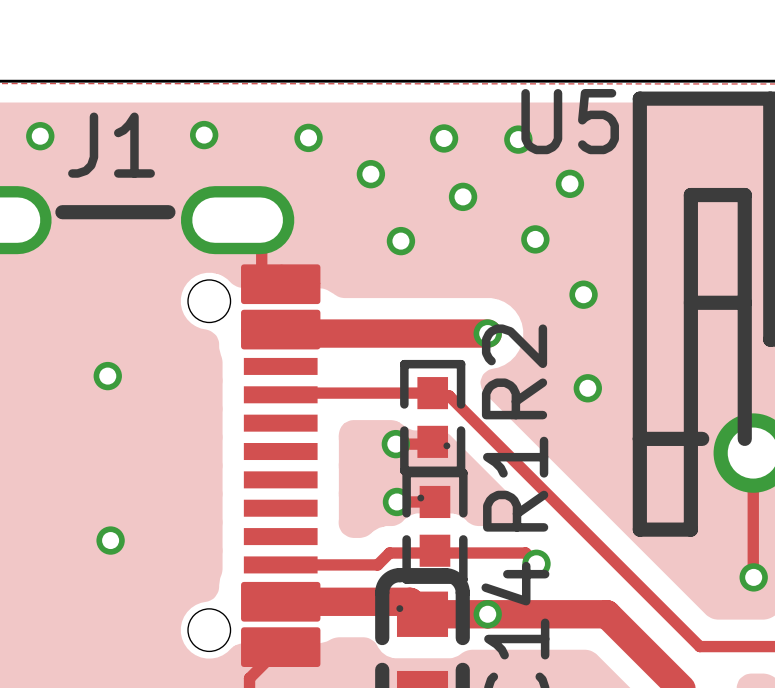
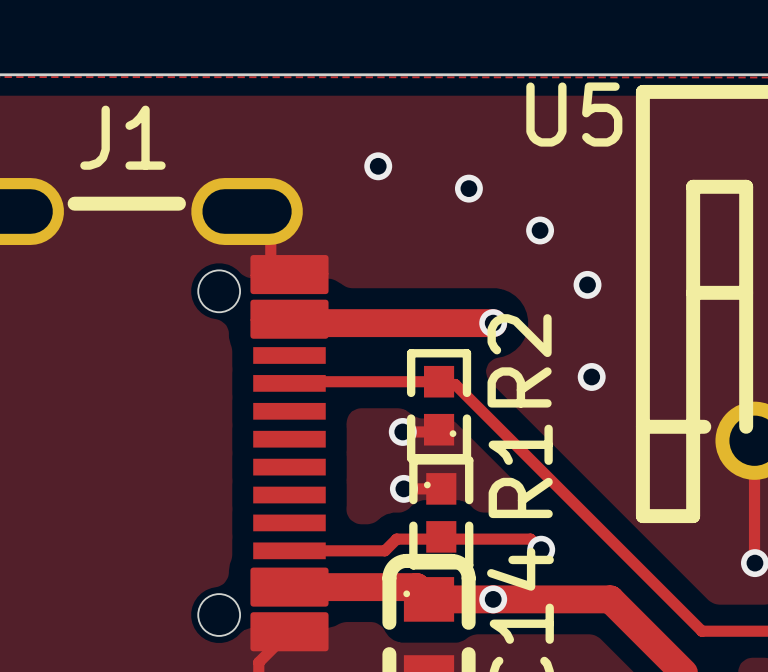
via: (204, 135) -> none
via: (40, 136) -> none
via: (308, 137) -> none
via: (444, 138) -> none
via: (518, 139) -> none
via: (569, 183) -> none
via: (400, 241) -> none
via: (107, 376) -> none
via: (110, 540) -> none

